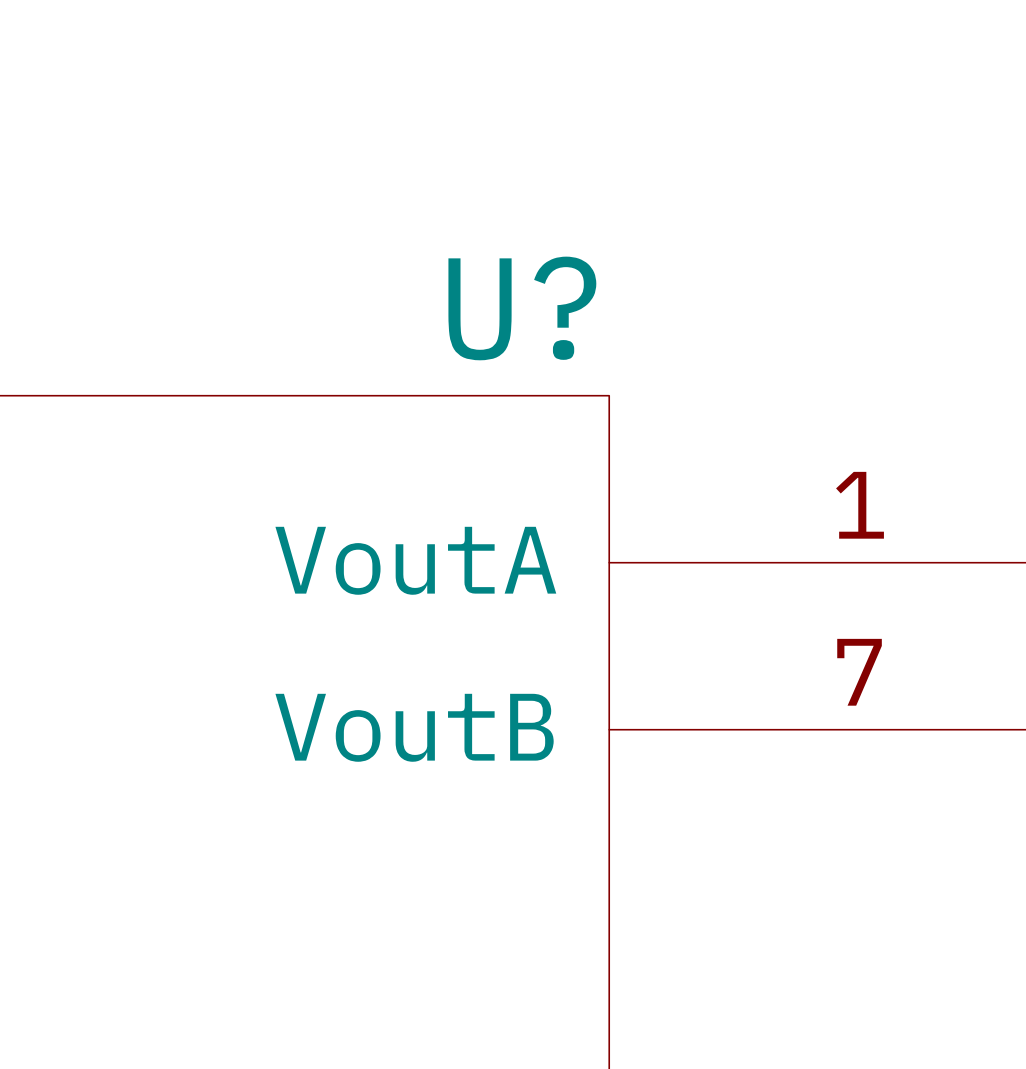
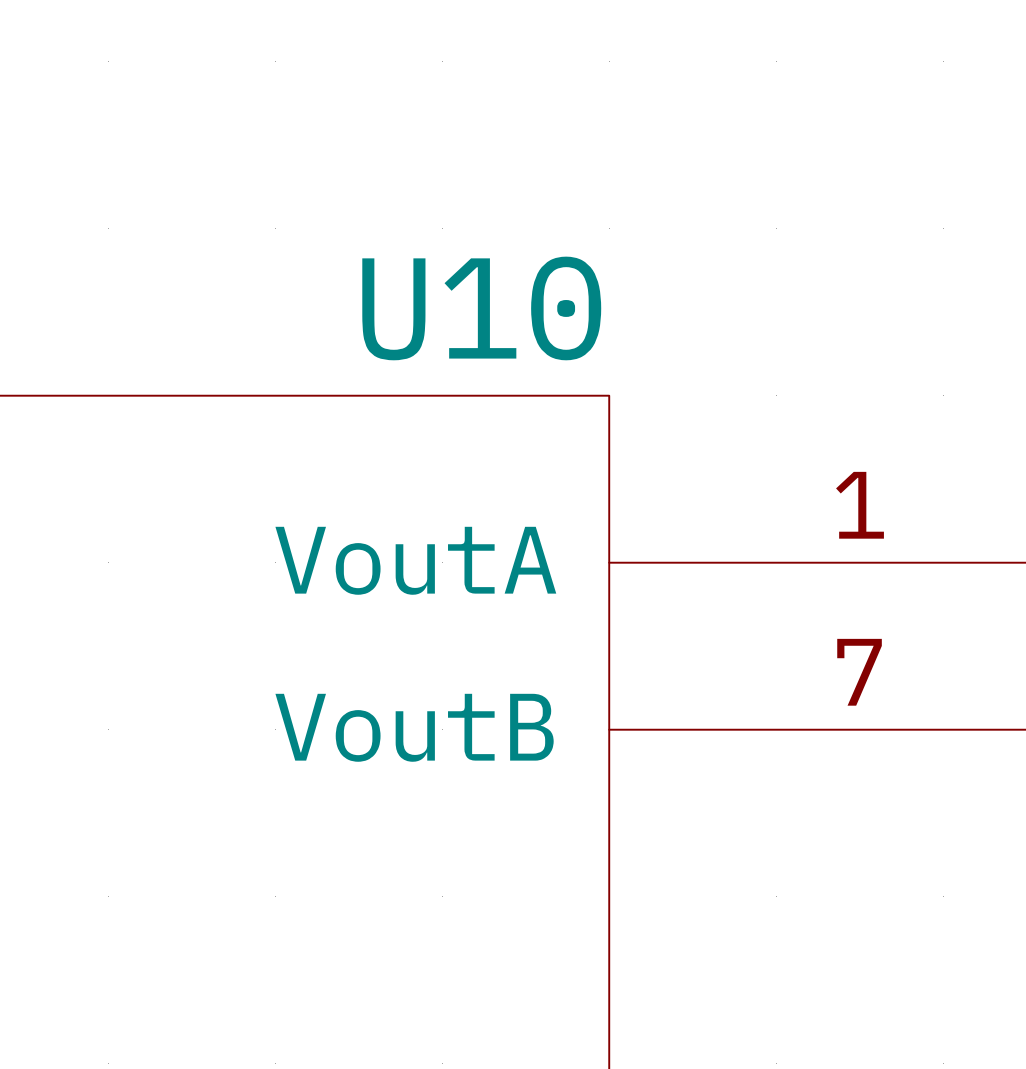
U? name: U? (522, 308) -> U10 (481, 308)

